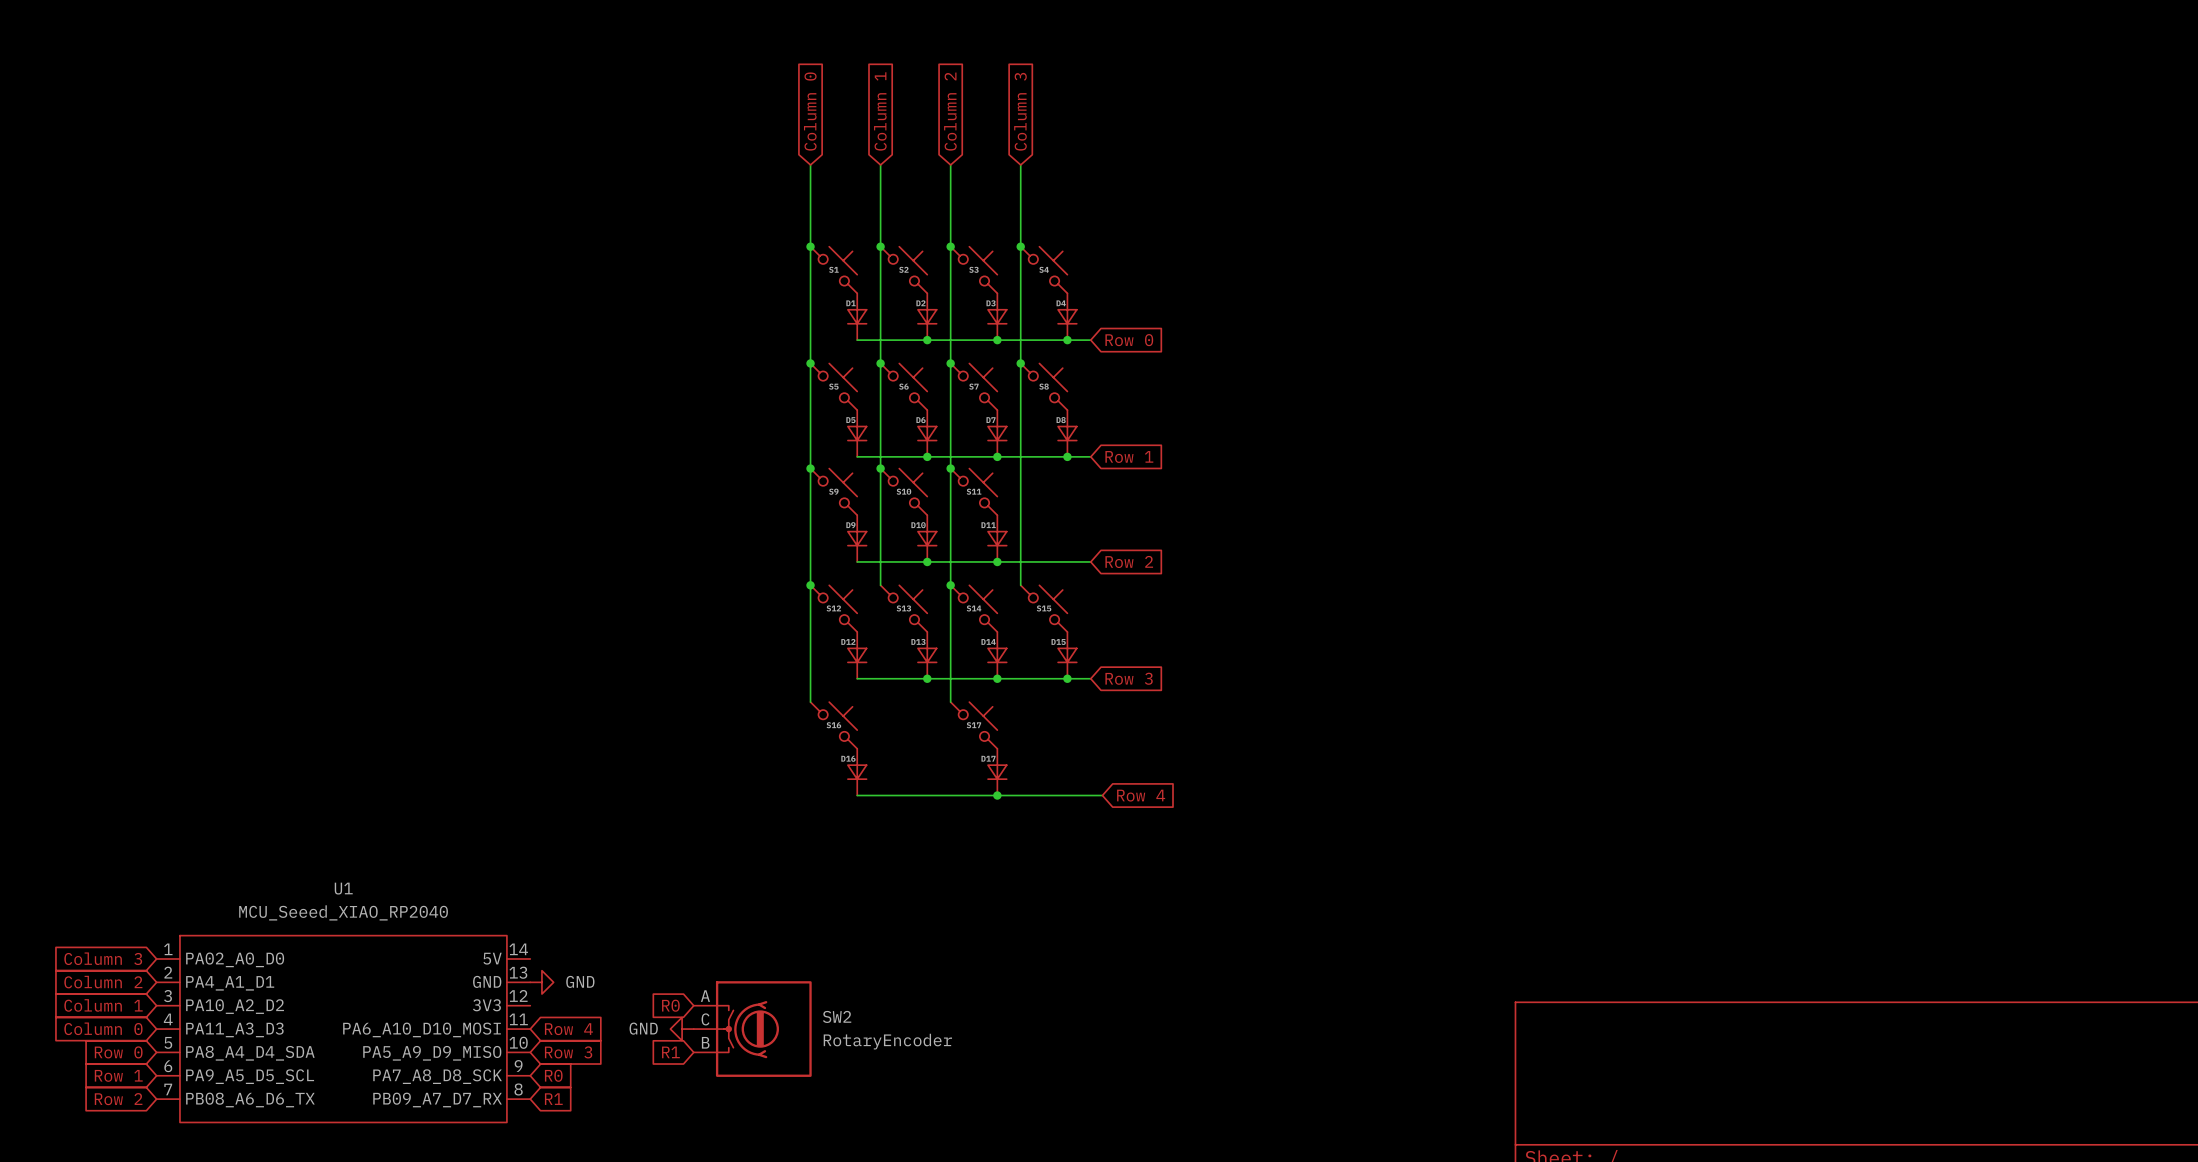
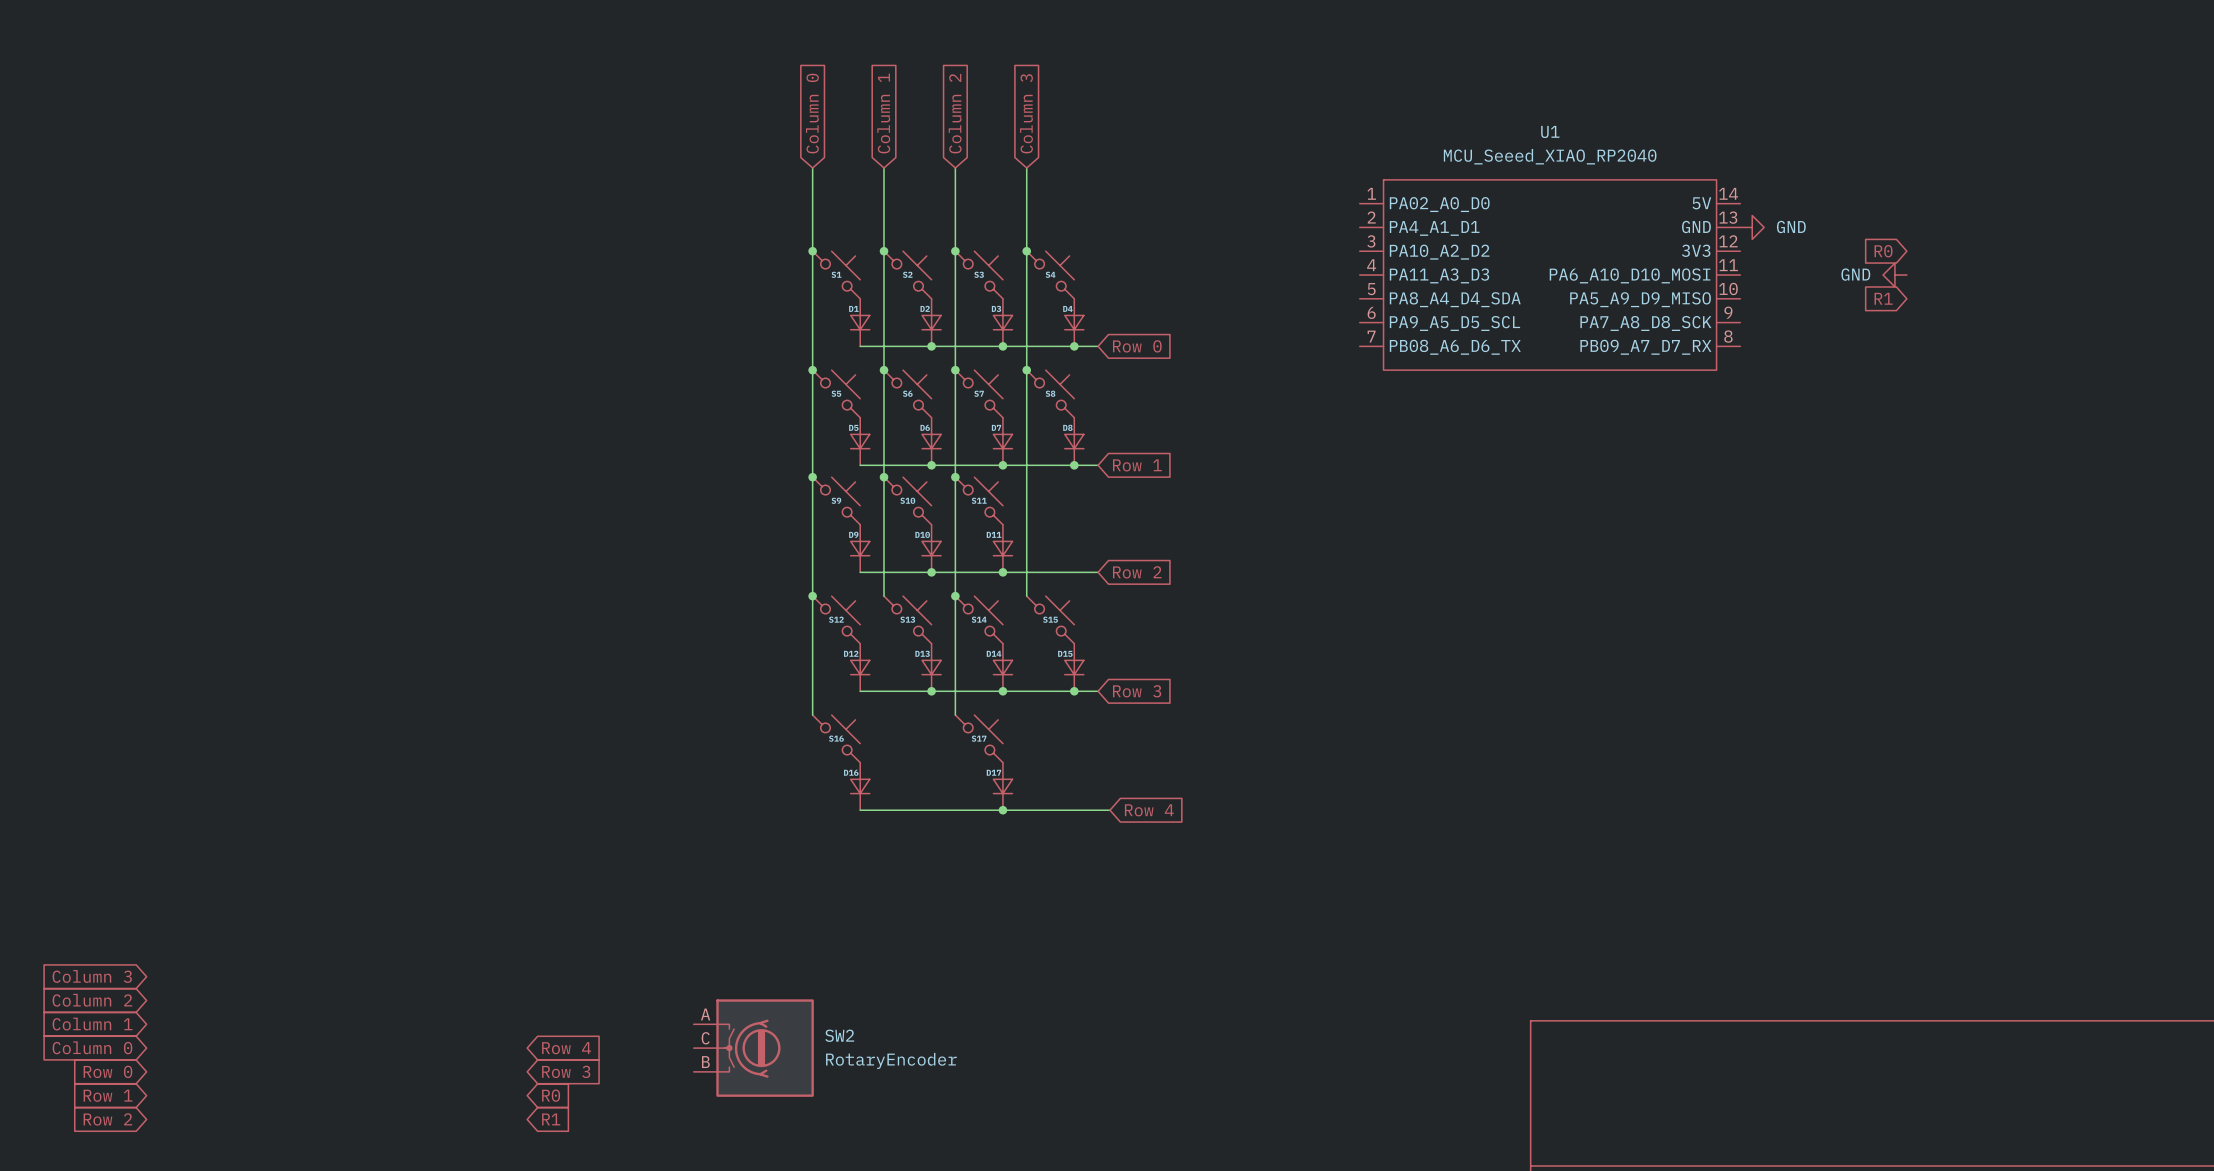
power symbol: none -> GND (1752, 227)
global label: none -> R0 (1883, 251)
power symbol: none -> GND (1894, 275)
global label: none -> R1 (1883, 298)
power symbol: GND (541, 982) -> none
global label: R0 (670, 1005) -> none
U1 position: (343, 1029) -> (1550, 275)
power symbol: GND (682, 1029) -> none
global label: R1 (670, 1052) -> none

